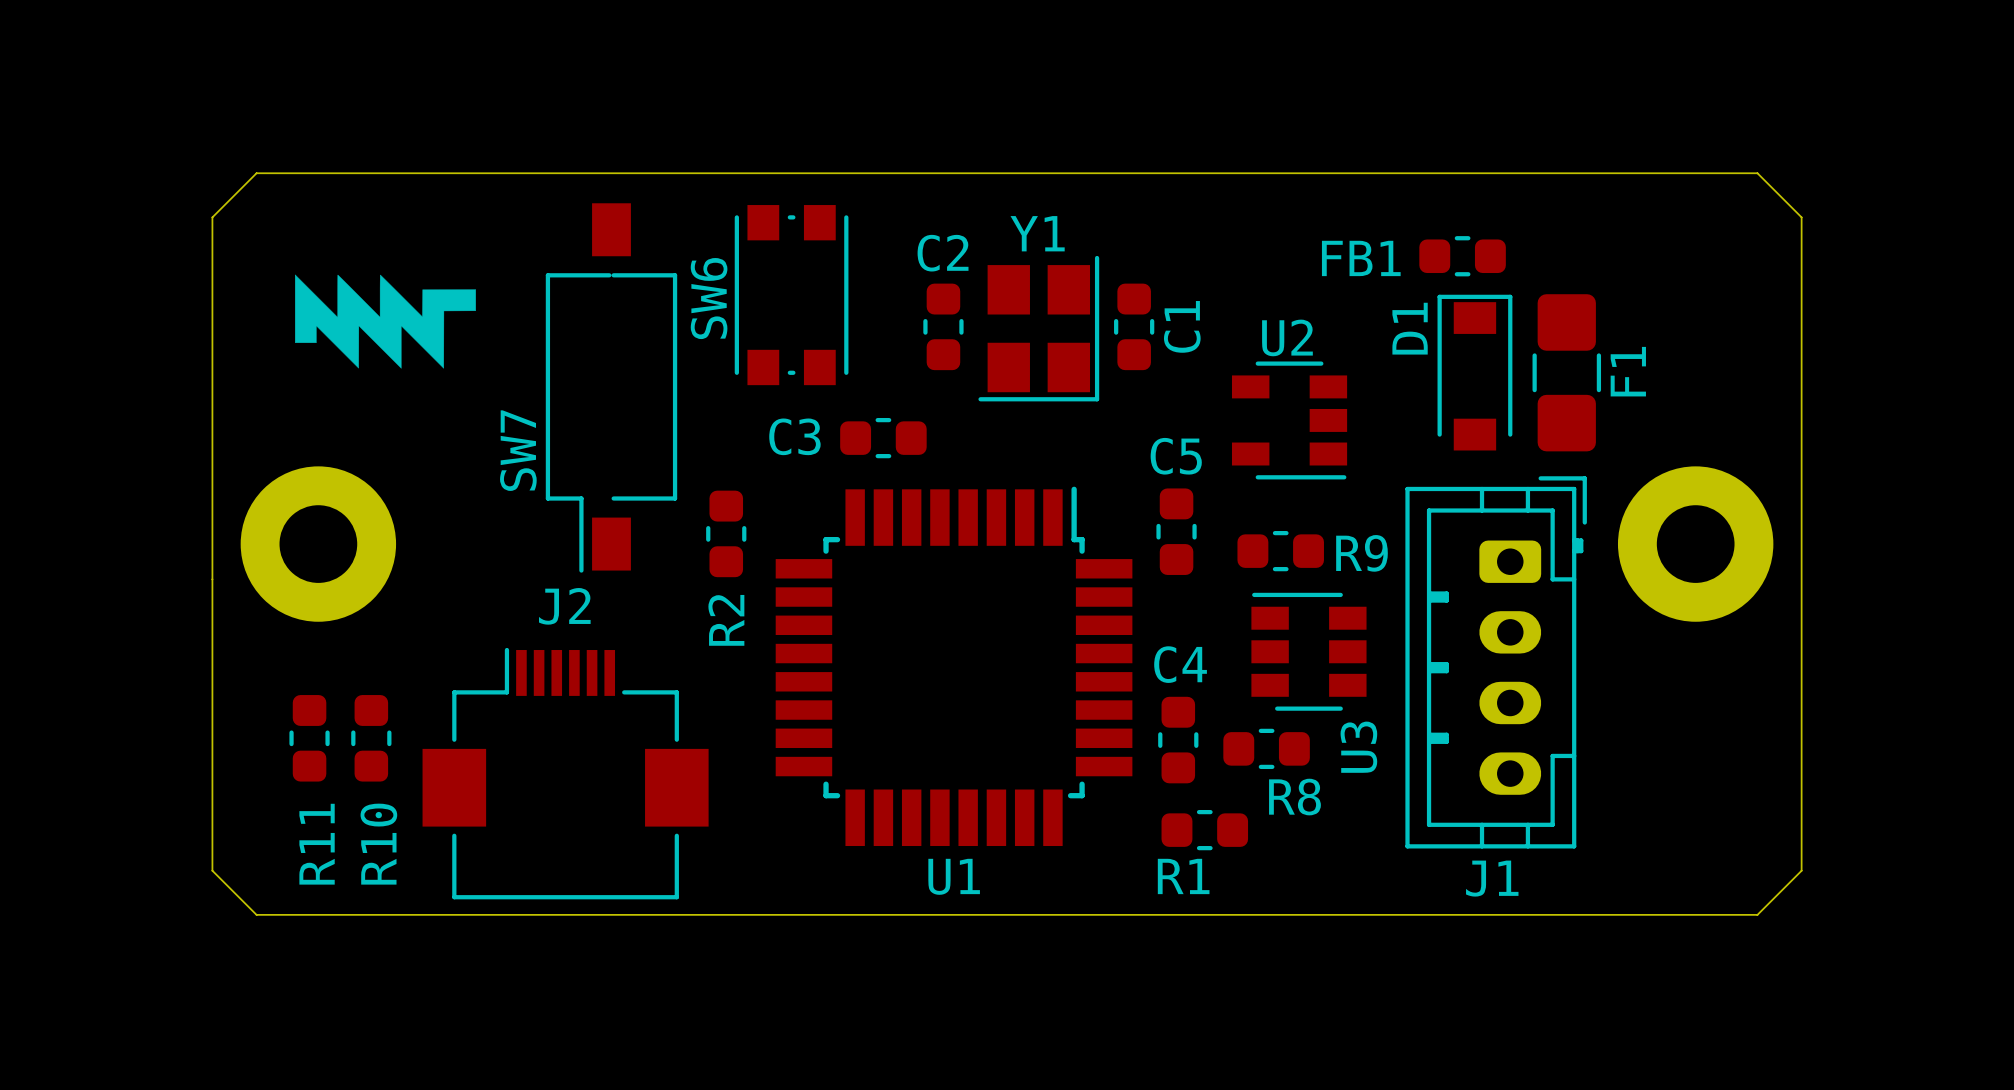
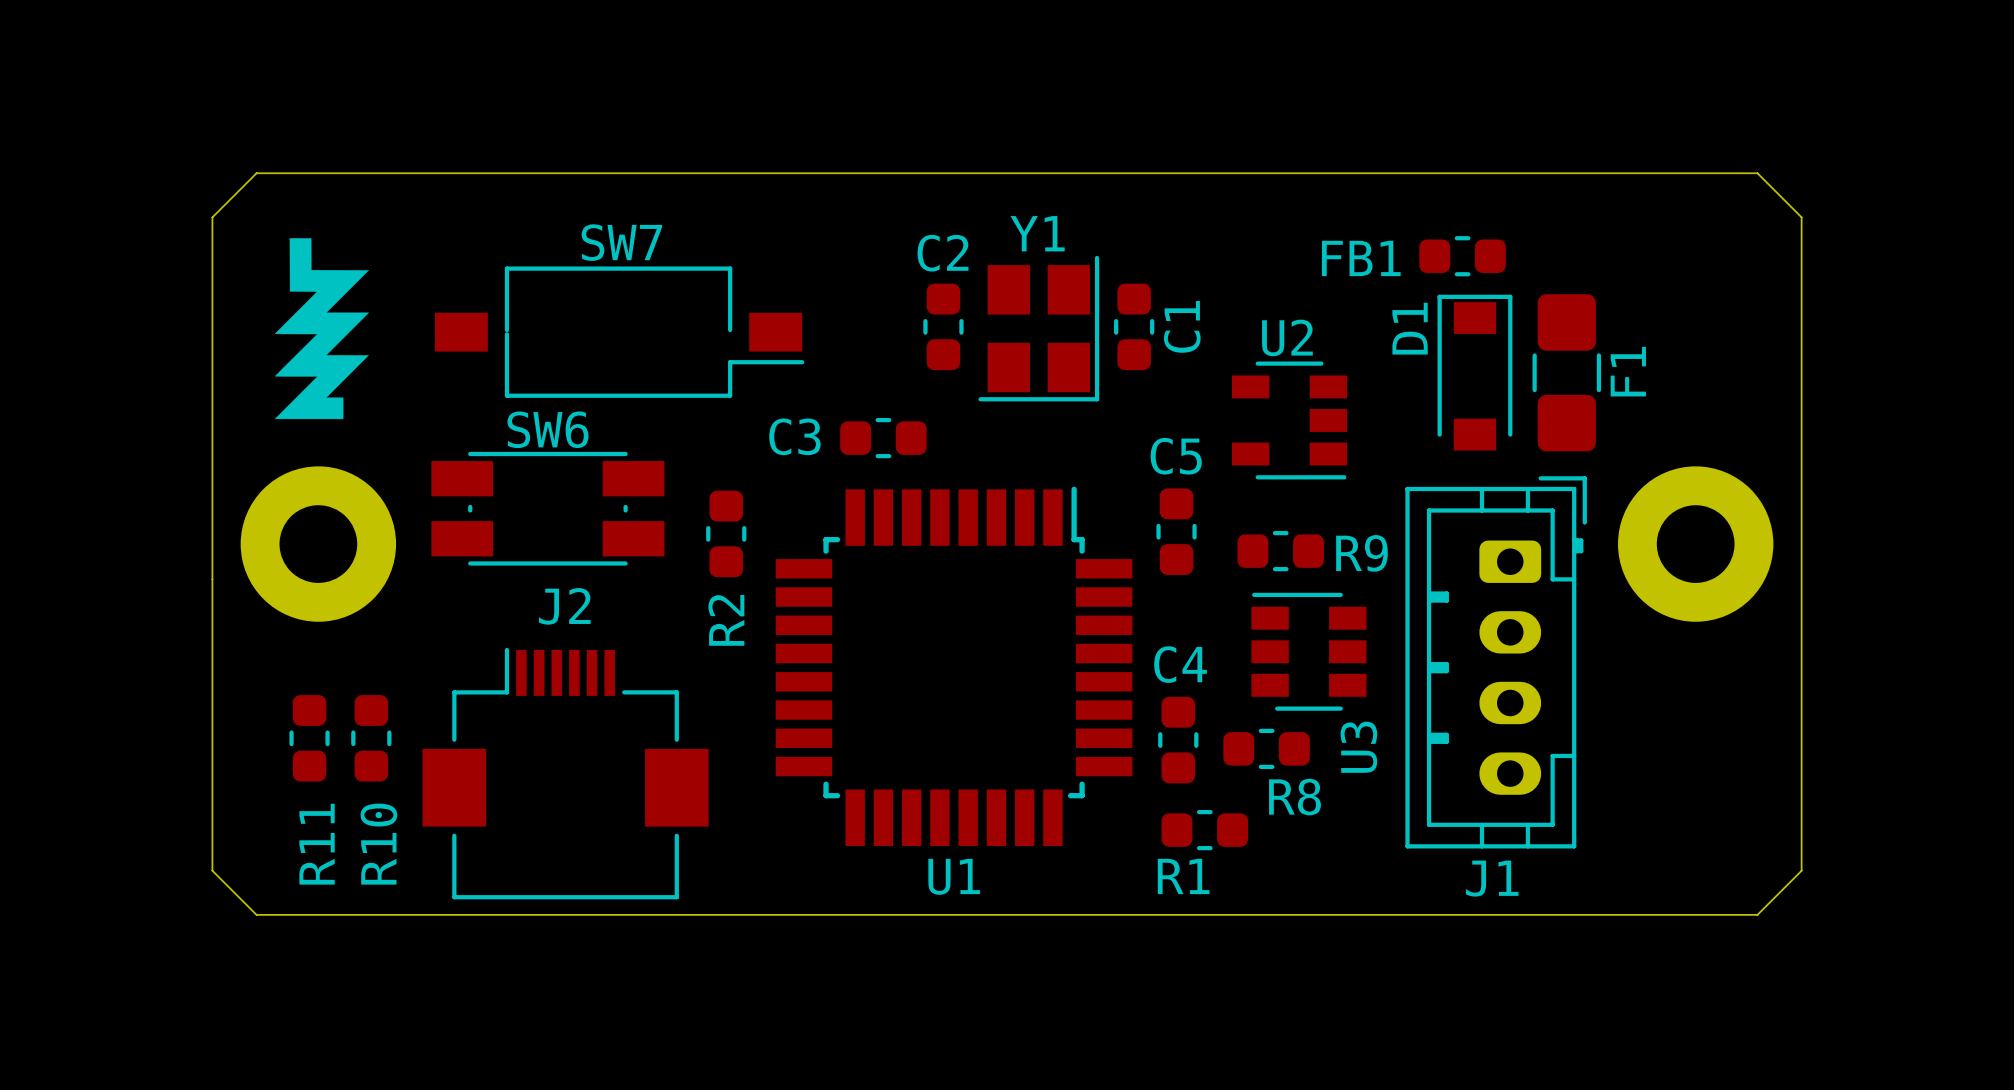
SW6 footprint: [734, 205, 849, 386] -> [431, 451, 665, 566]
drawing: none -> [274, 238, 369, 420]
drawing: [294, 274, 476, 369] -> none
SW6 name position: SW6 (709, 298) -> SW6 (547, 429)
SW7 rotation: 0° (611, 387) -> 90° counterclockwise (619, 332)
SW7 name position: SW7 (518, 450) -> SW7 (621, 242)

